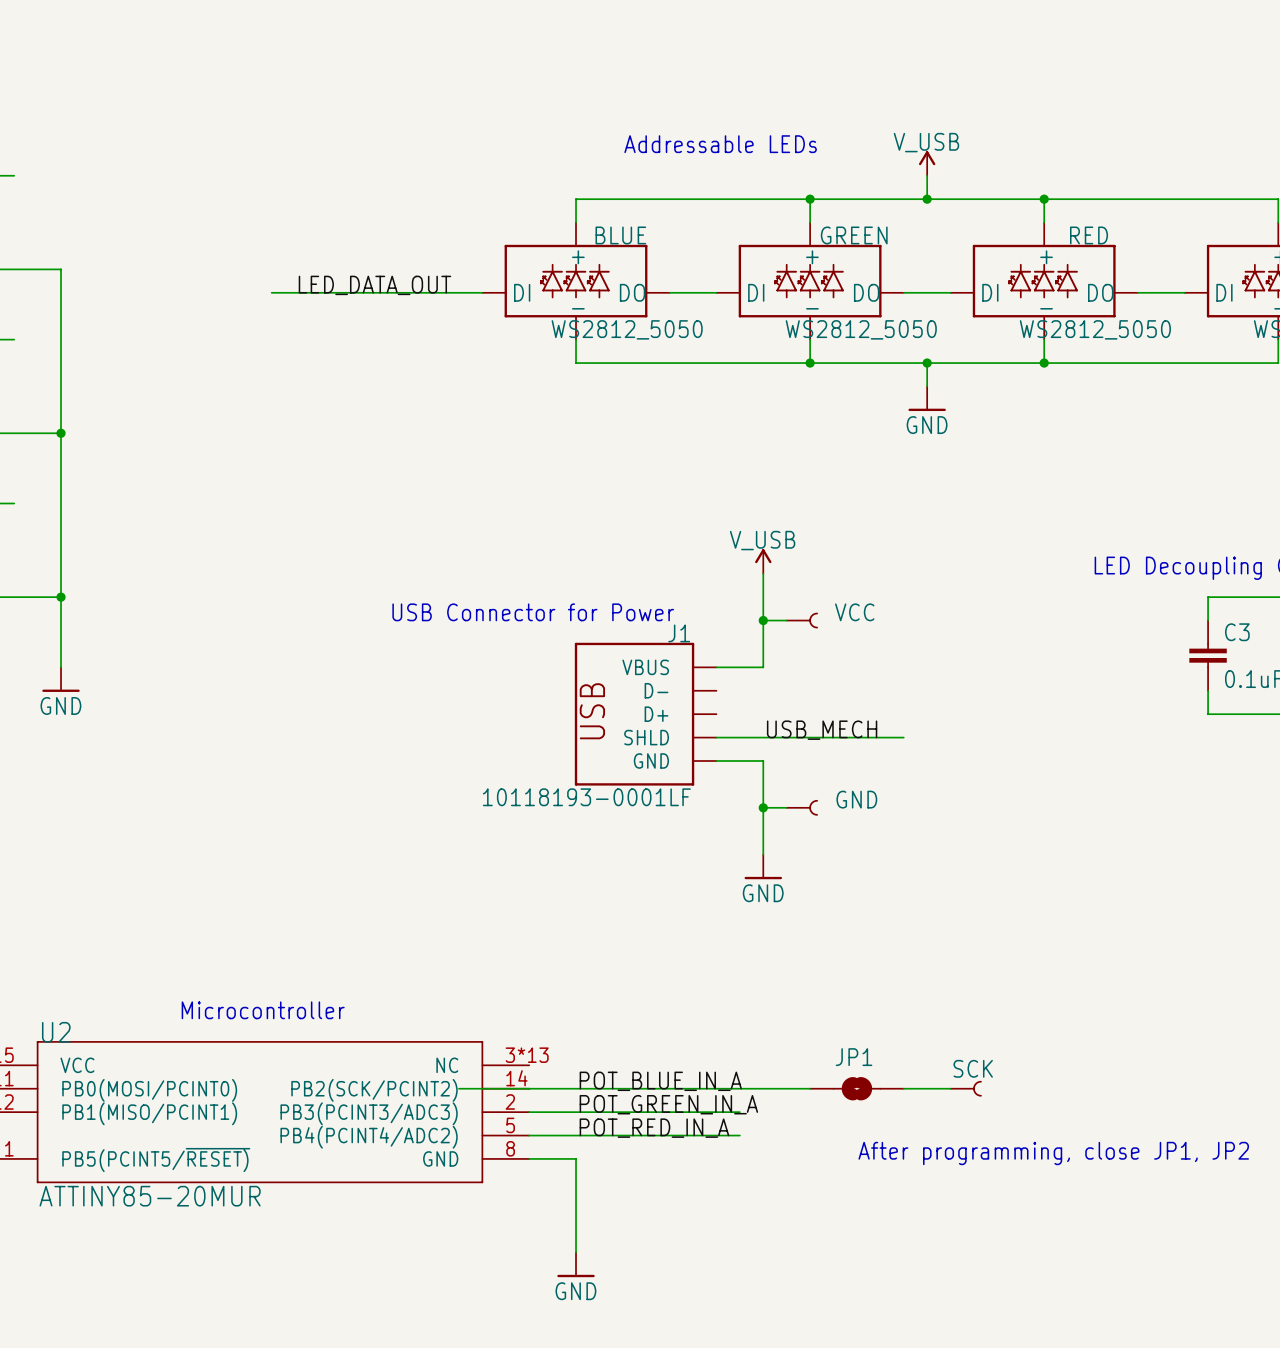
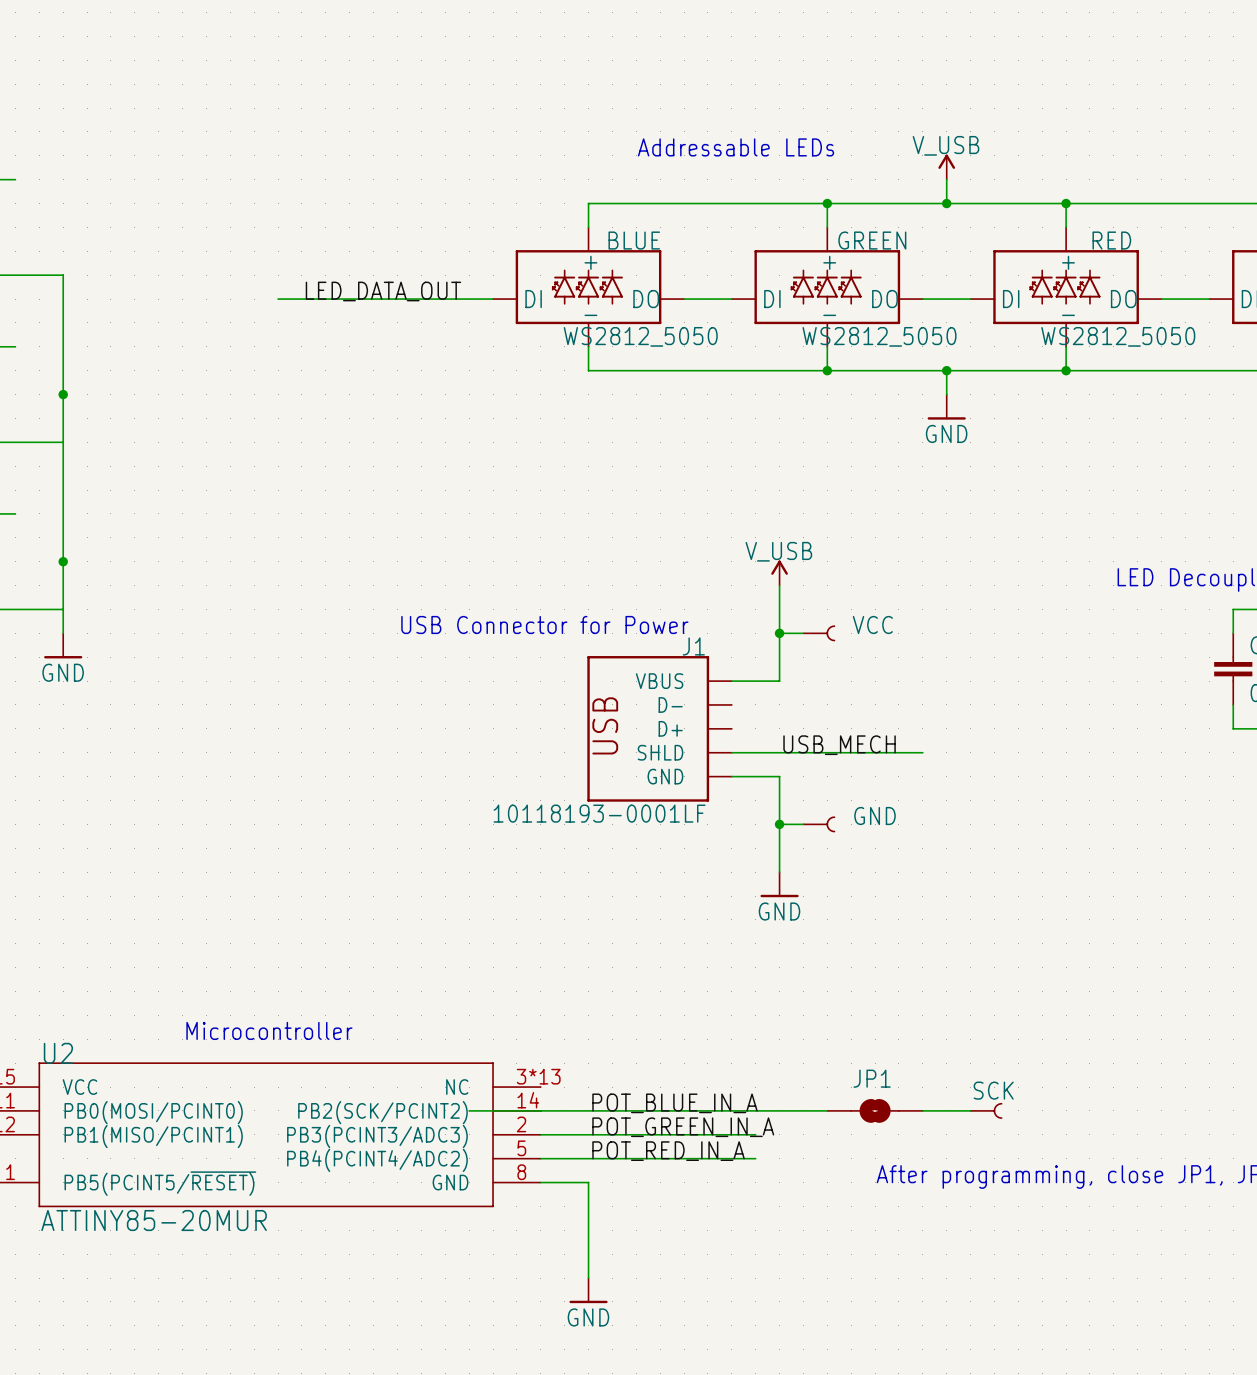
junction position: (61, 433) -> (63, 394)
junction position: (61, 597) -> (63, 561)
power symbol position: GND (61, 679) -> GND (63, 645)

